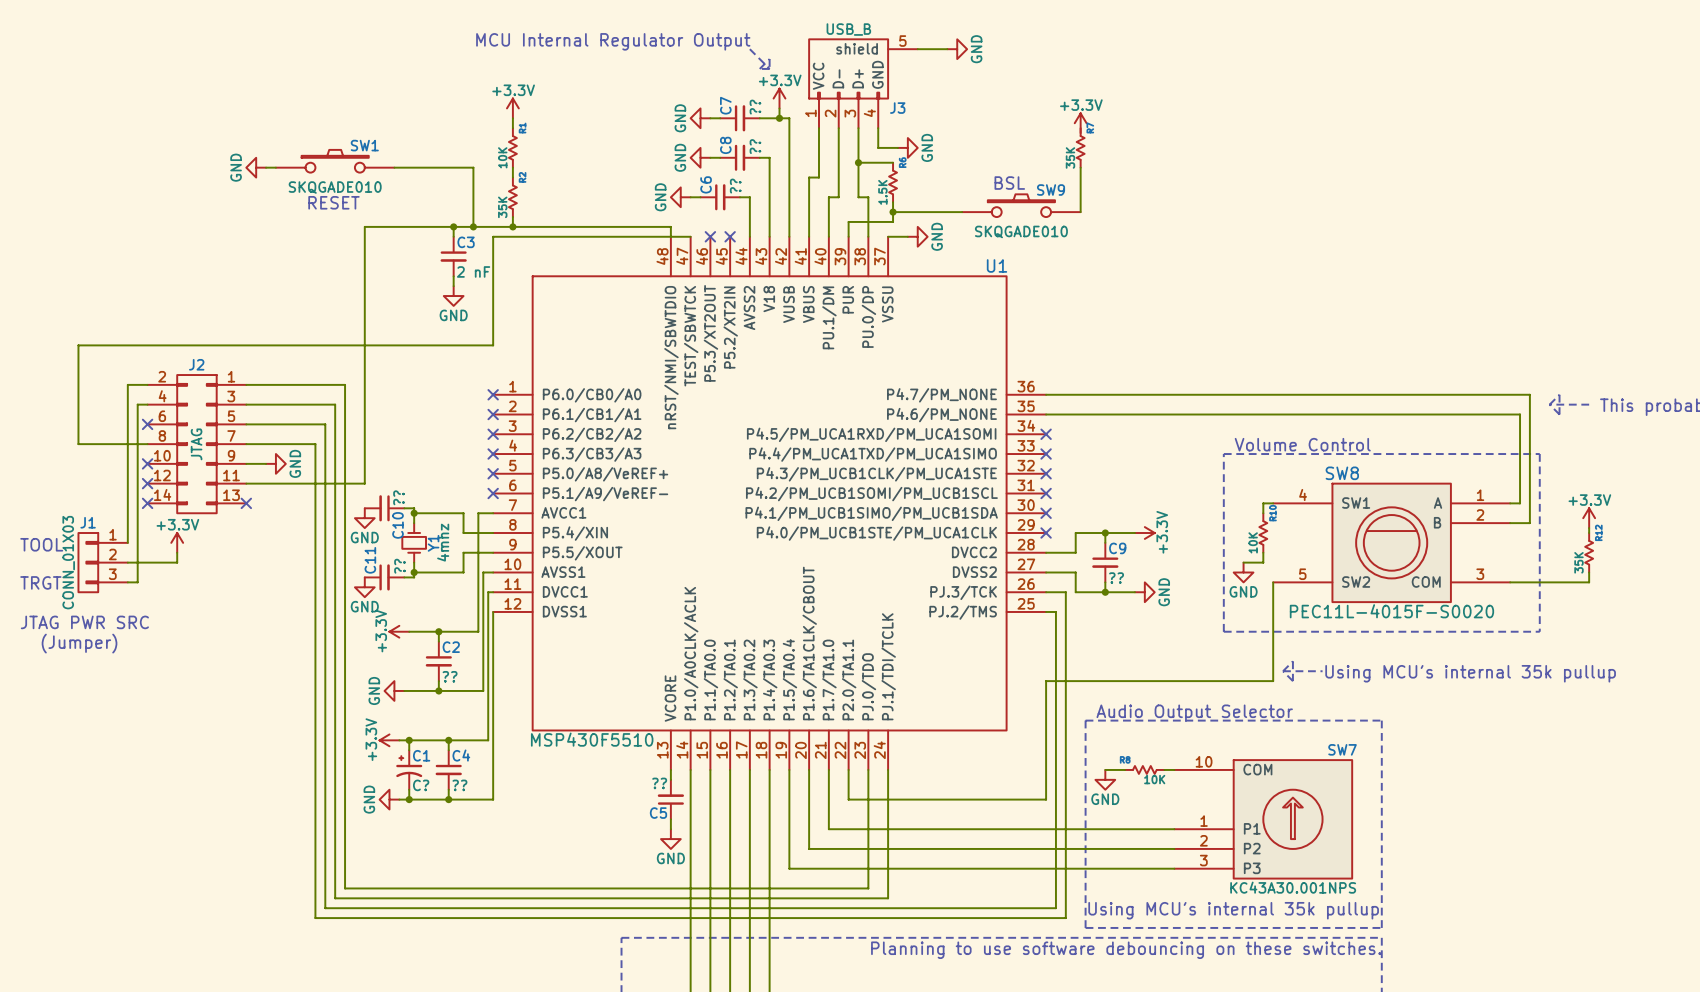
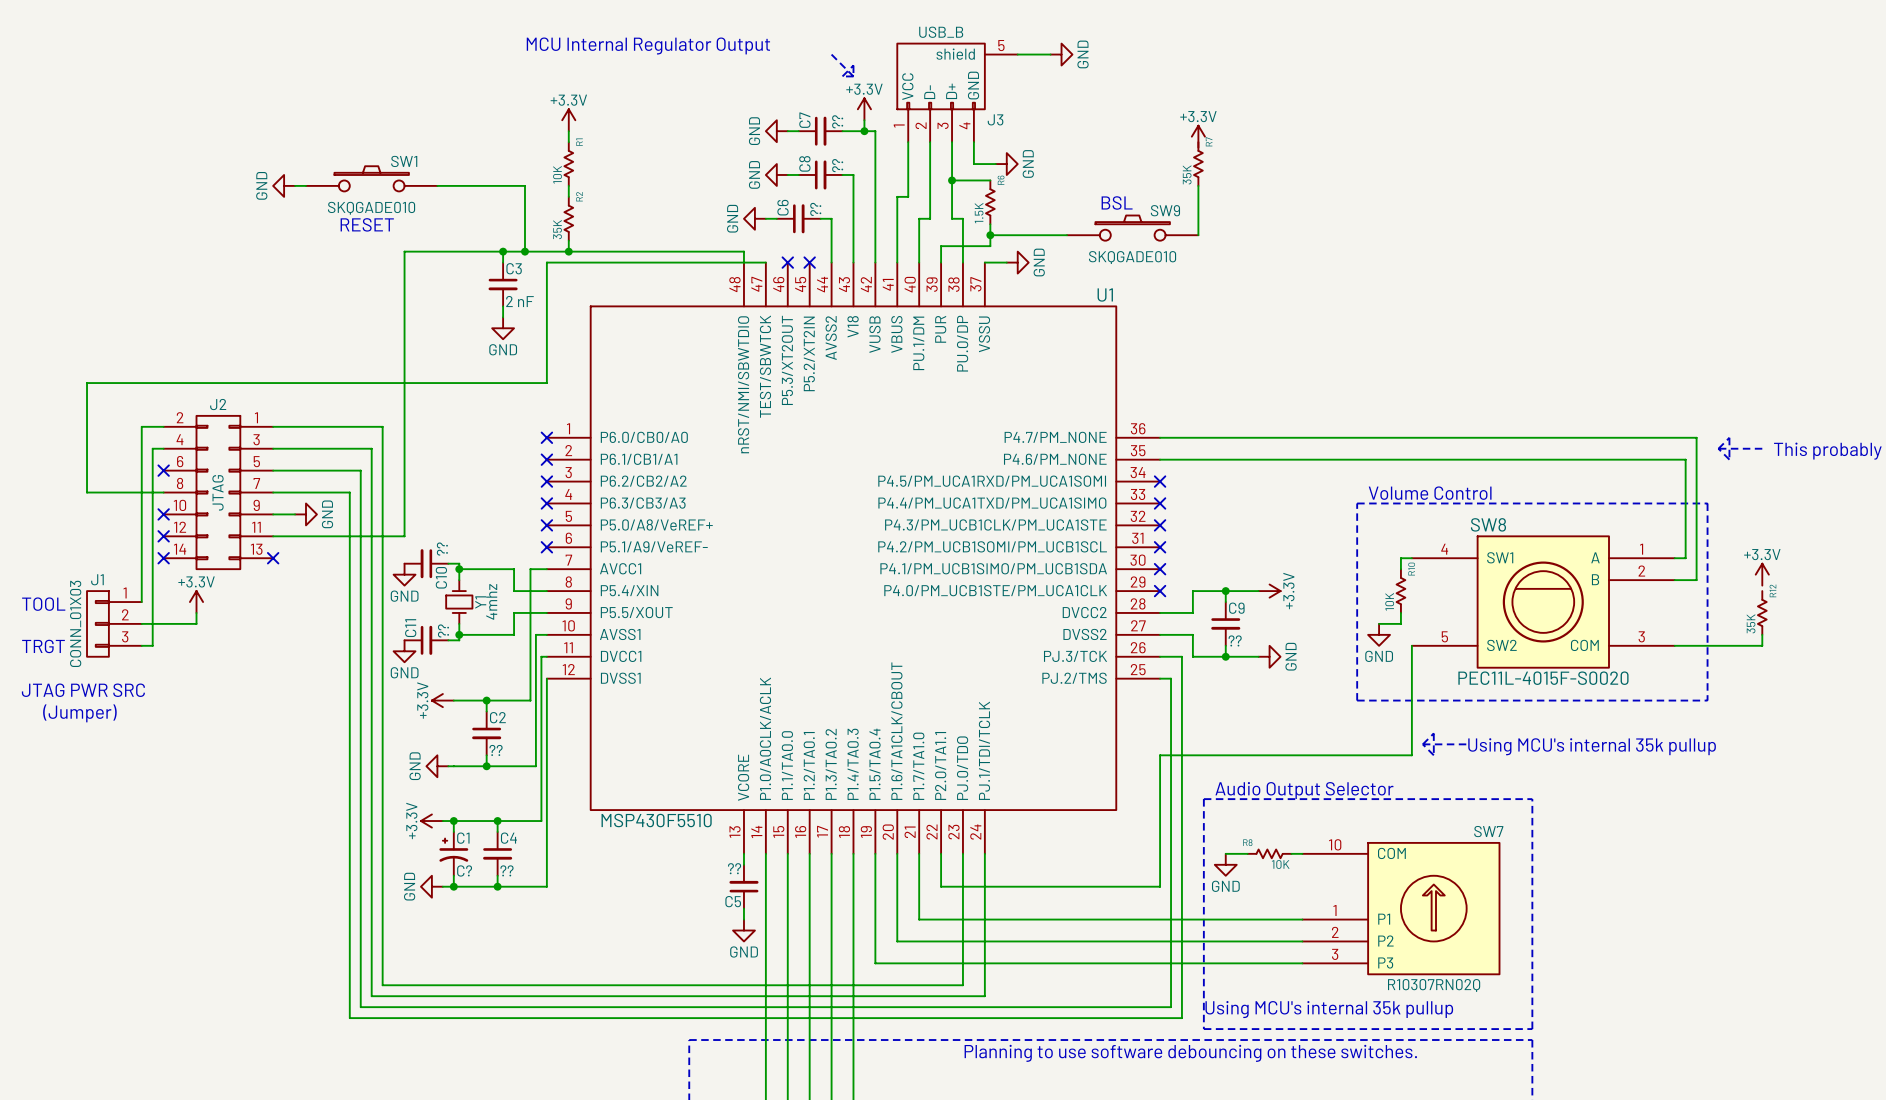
wire: (1589, 528) (1589, 533) -> none
SW7 value: KC43A30.001NPS (1293, 887) -> R10307RN02Q (1434, 985)

